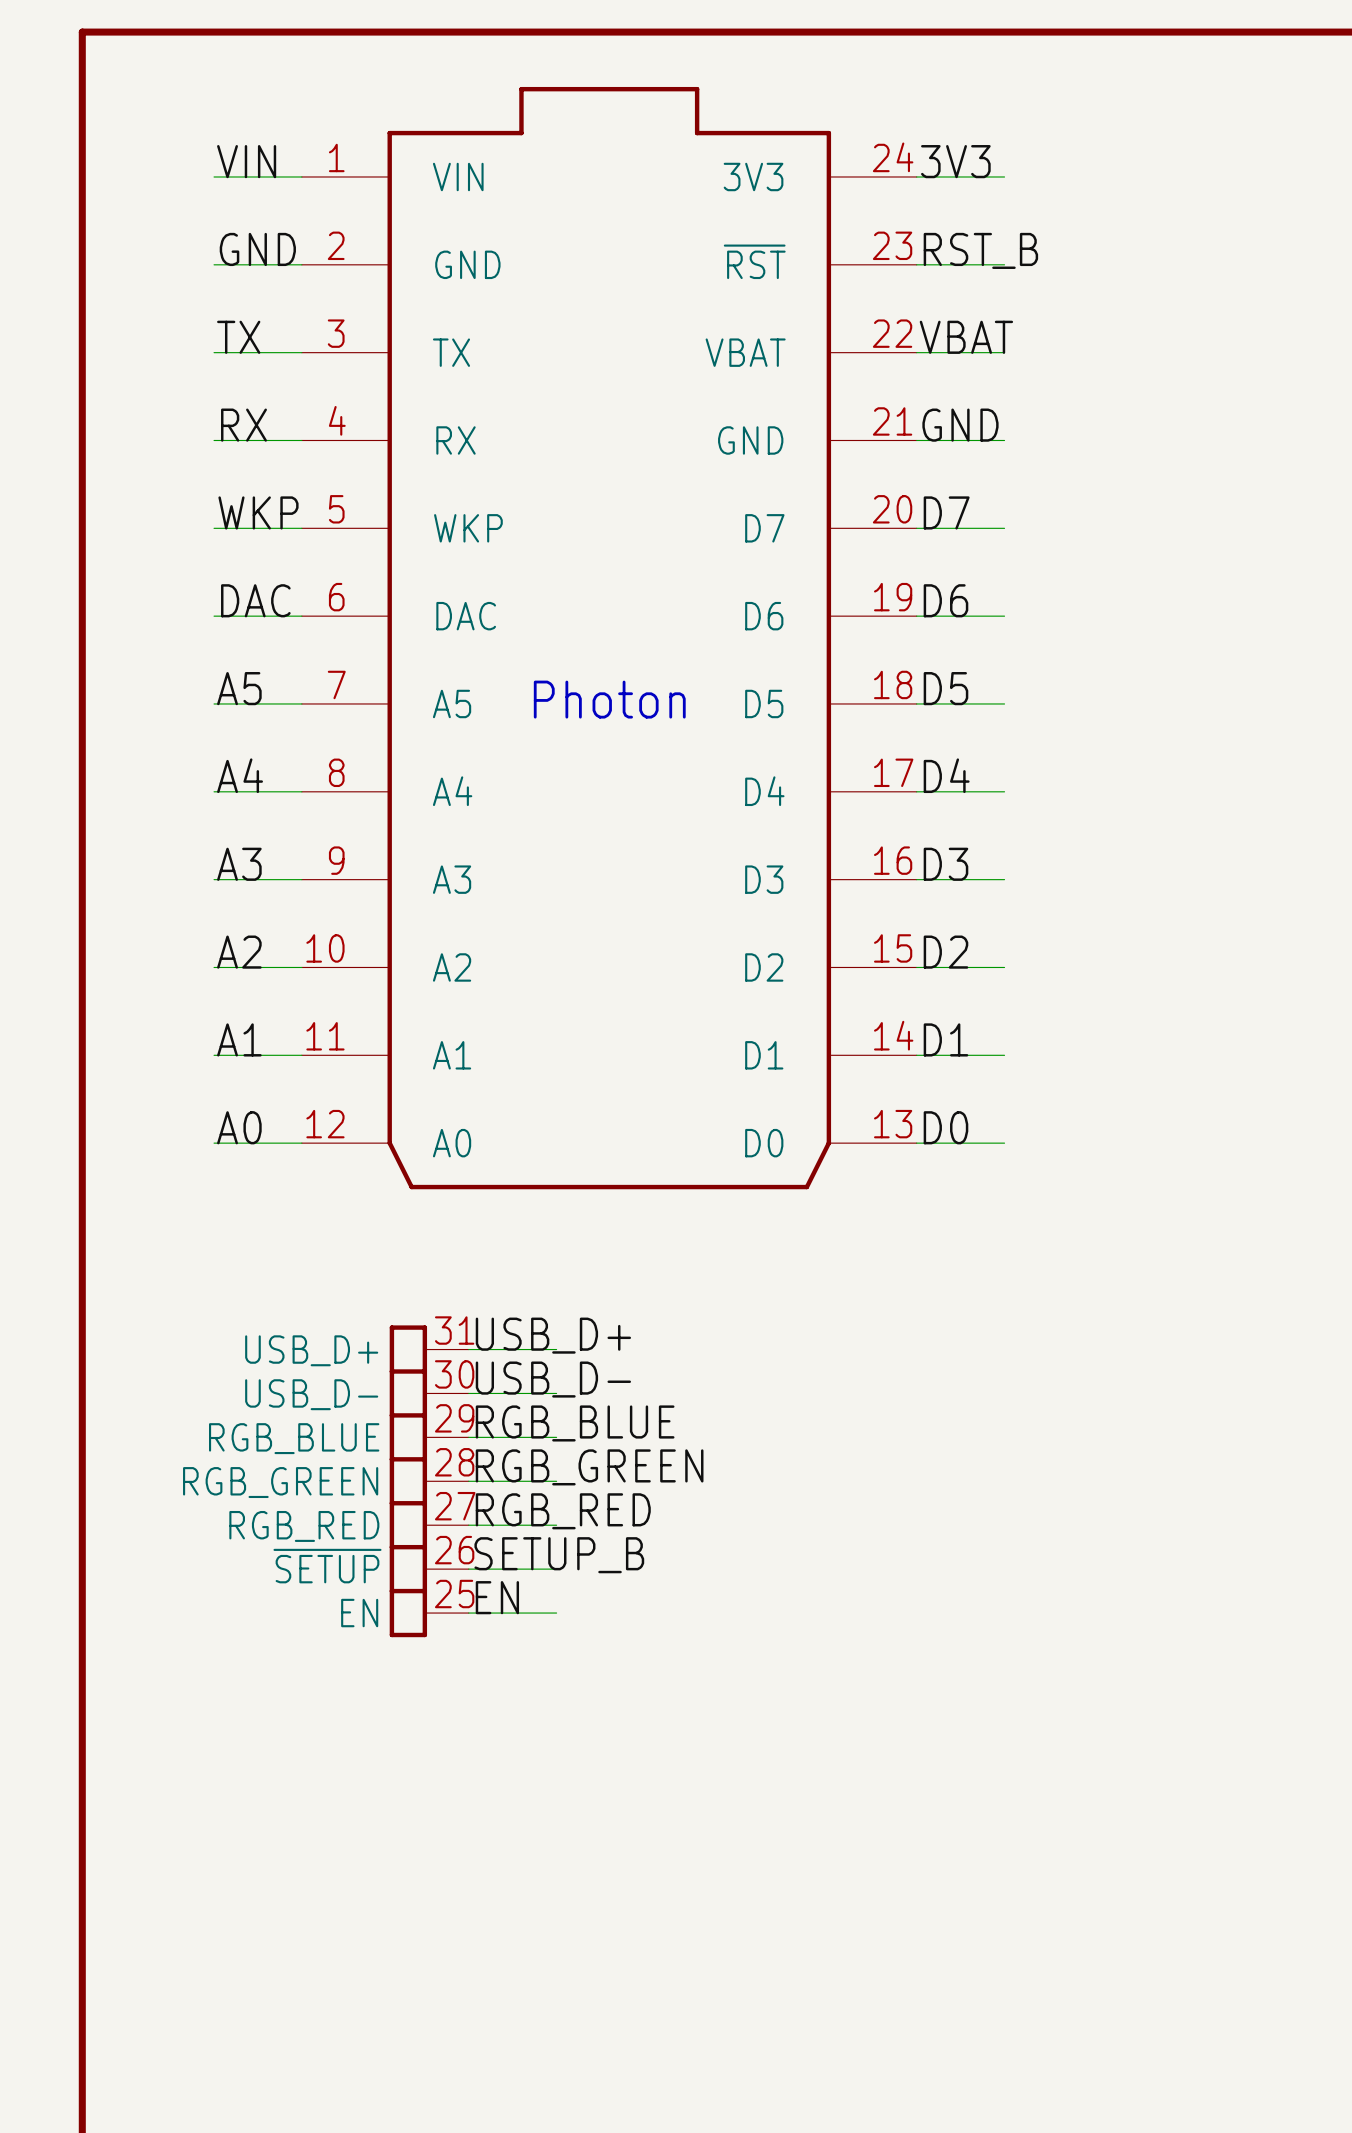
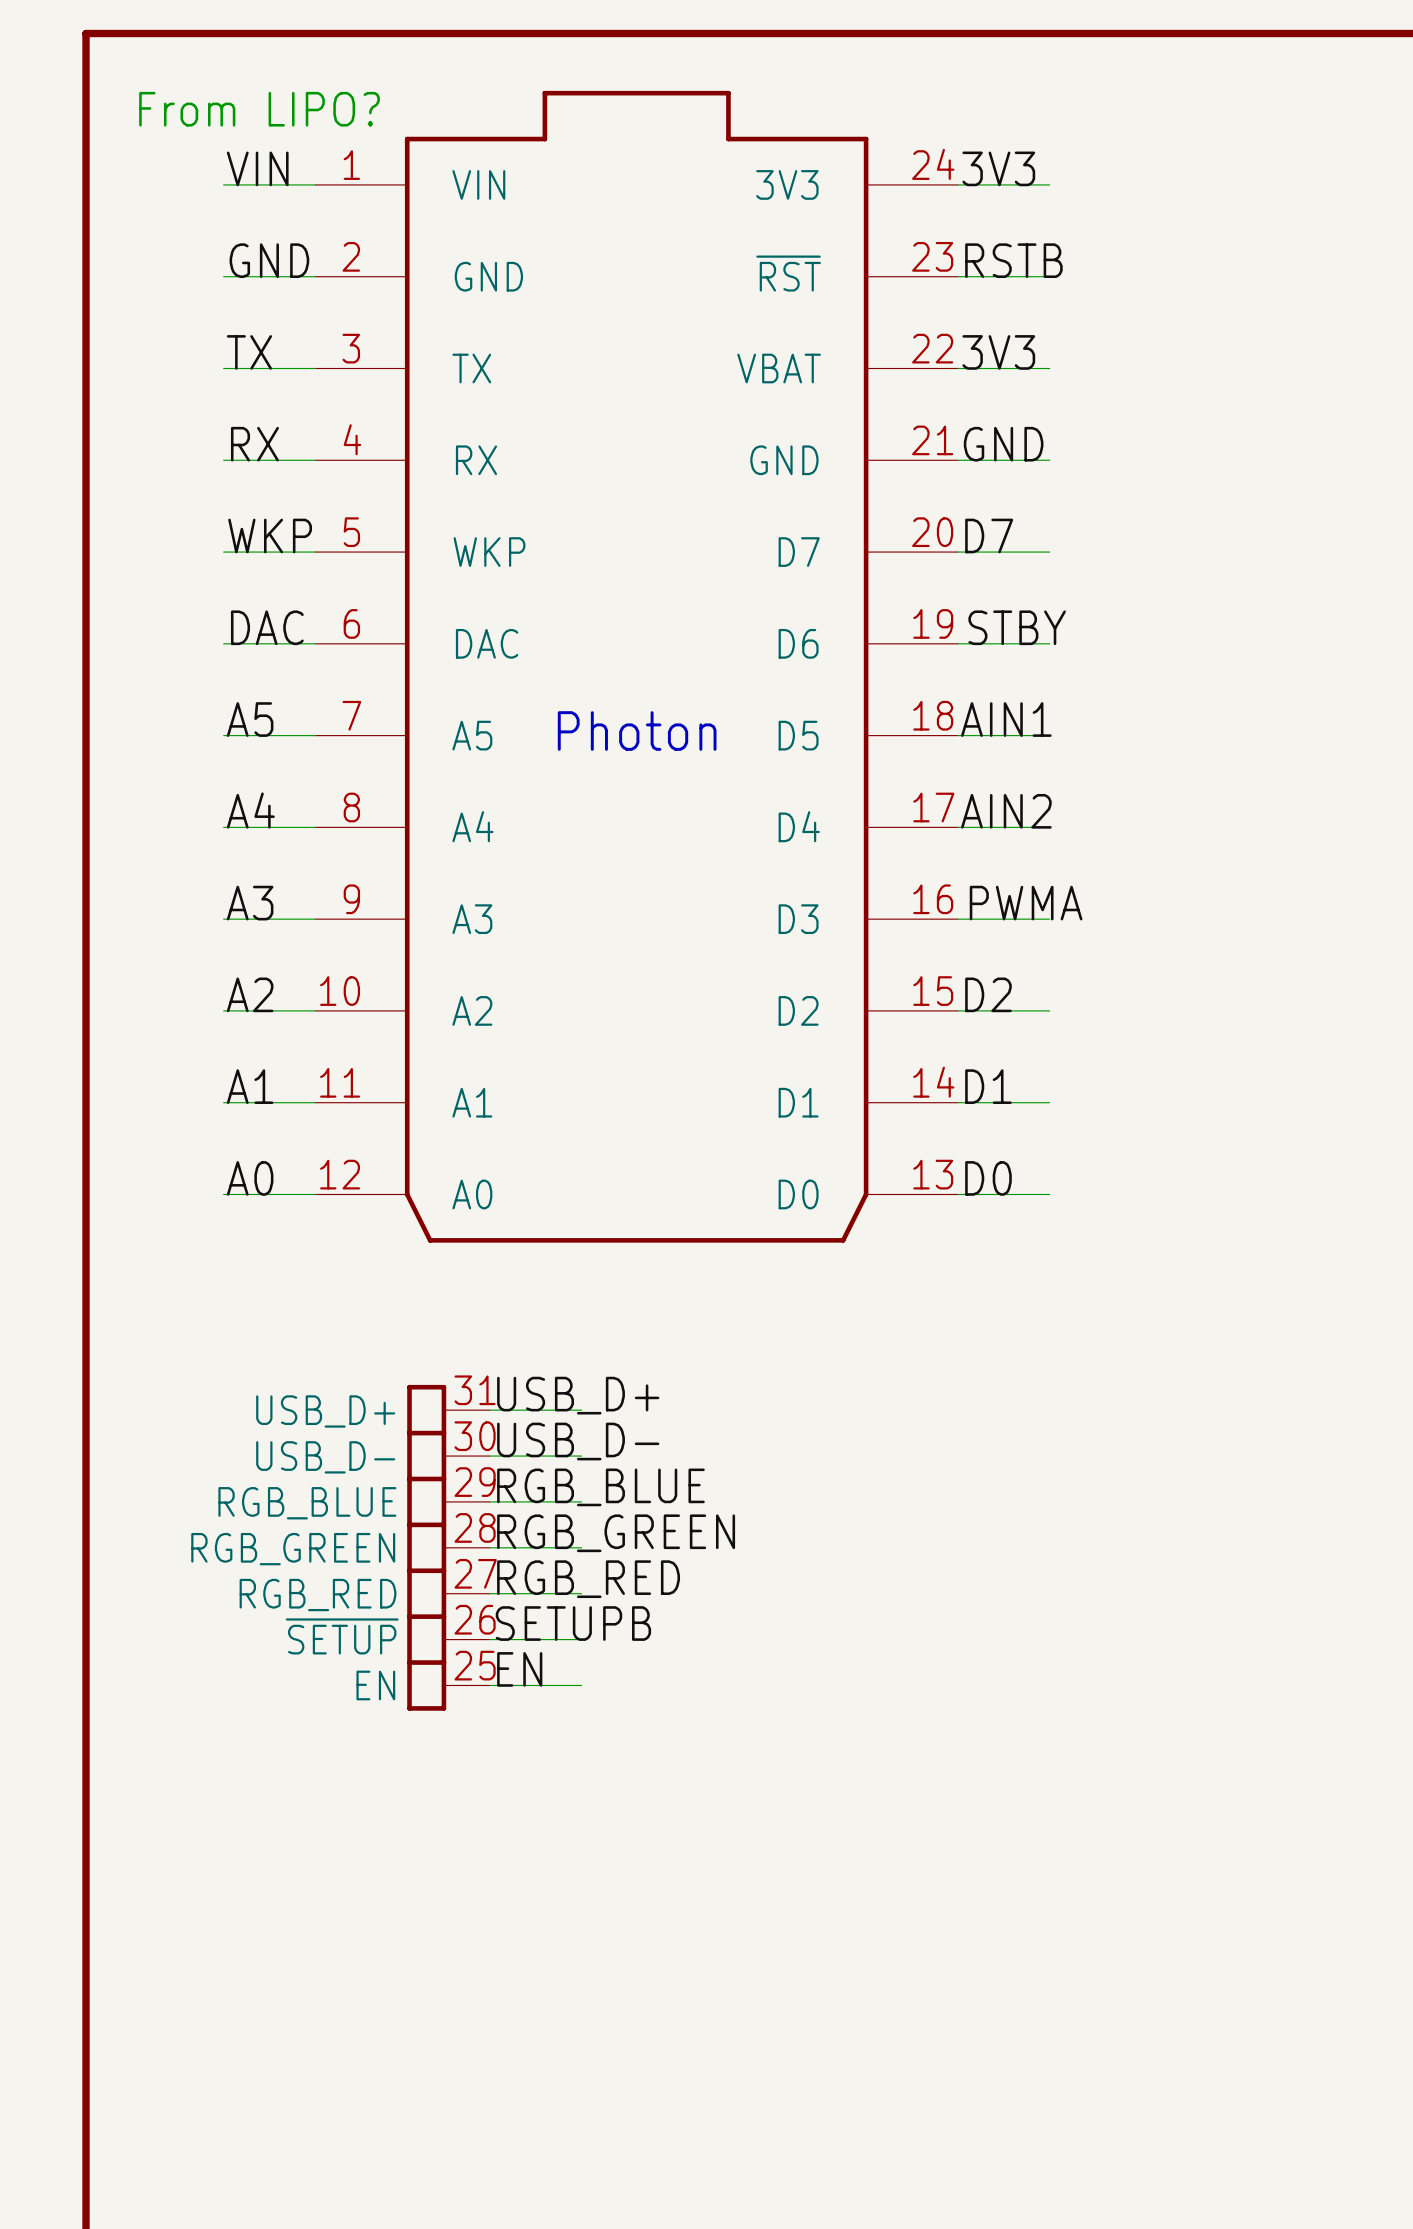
text: none -> From LIPO? (259, 109)
label: RST_B (980, 250) -> RSTB (1013, 260)
label: VBAT (966, 337) -> 3V3 (998, 352)
label: D6 (945, 600) -> STBY (1017, 627)
label: D5 (945, 688) -> AIN1 (1006, 719)
label: D4 (946, 775) -> AIN2 (1006, 811)
label: D3 (945, 864) -> PWMA (1026, 903)
label: SETUP_B (559, 1555) -> SETUPB (573, 1623)

